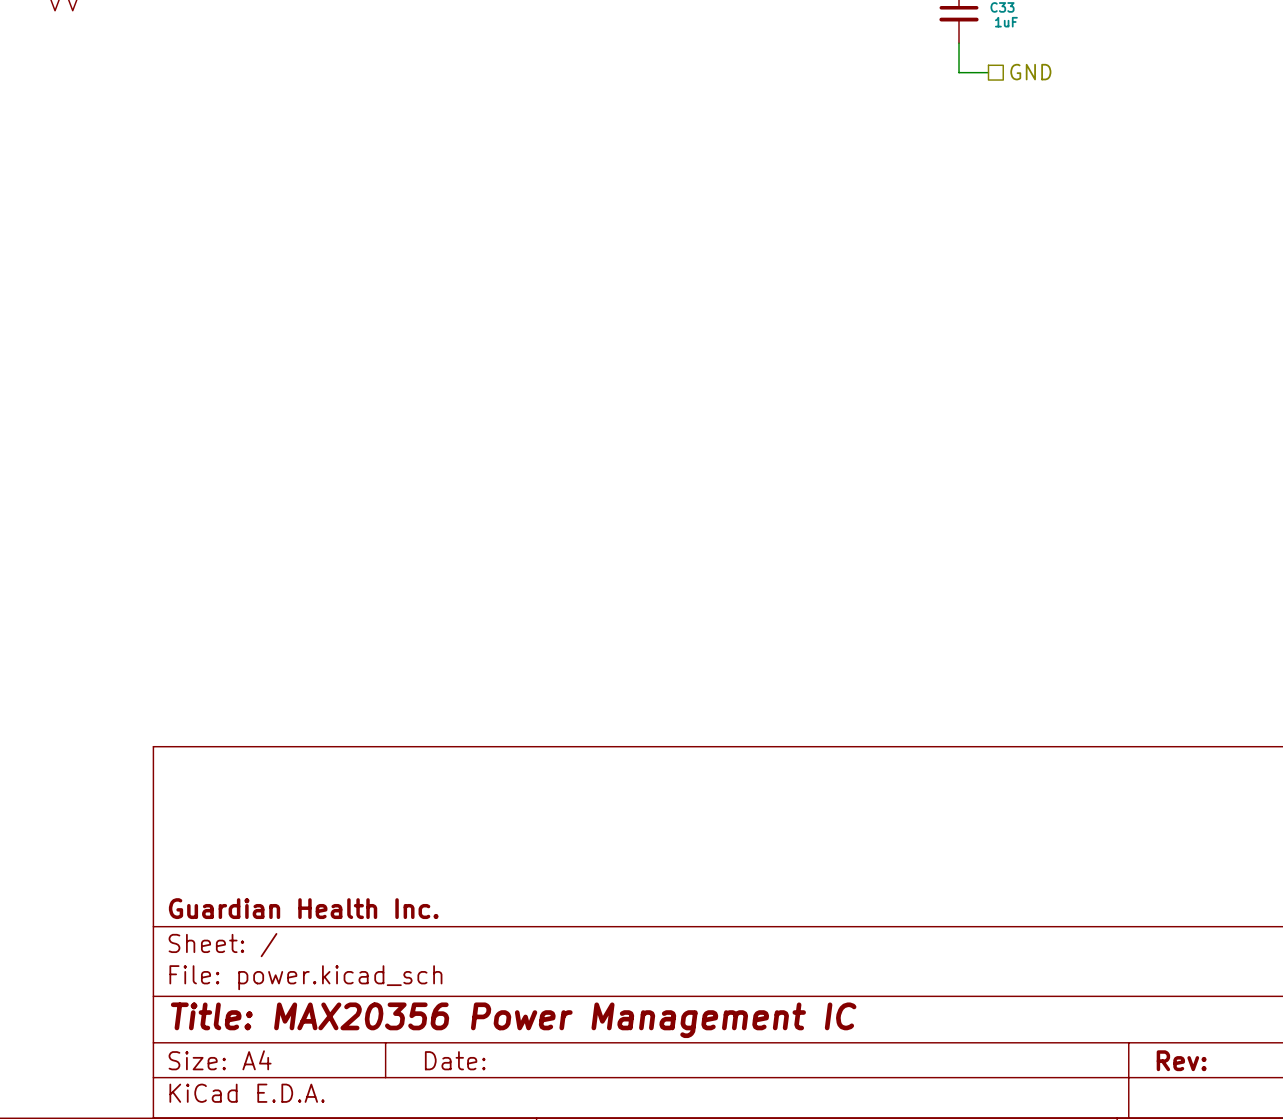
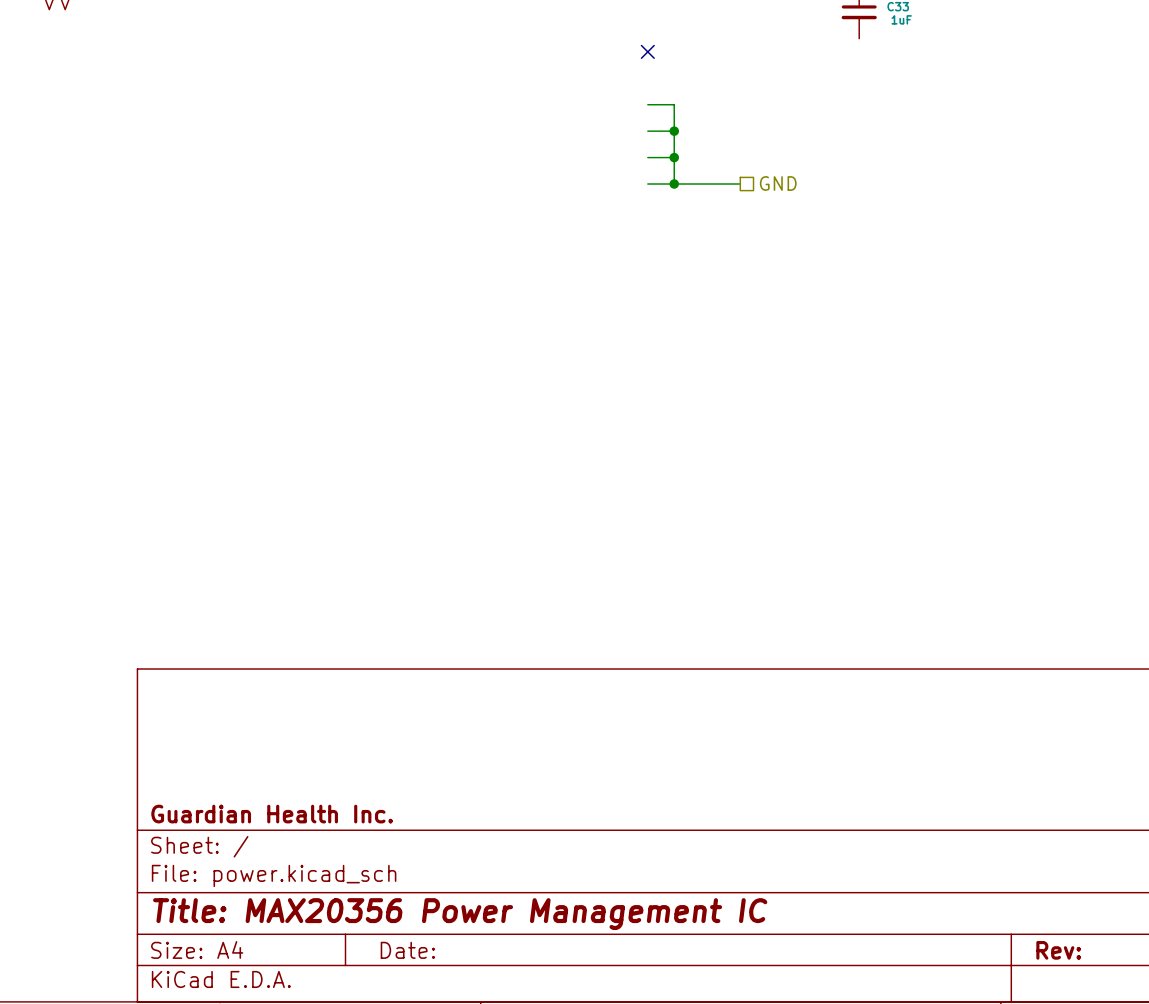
wire: (959, 43) (959, 72) (988, 72) -> none
no-connect mark: none -> (647, 51)
hierarchical label: GND (1030, 72) -> none
wire: none -> (647, 104) (674, 104) (674, 184)
wire: none -> (647, 131) (674, 131)
junction: none -> (674, 131)
wire: none -> (647, 157) (674, 157)
junction: none -> (674, 157)
hierarchical label: none -> GND (778, 183)
wire: none -> (647, 184) (740, 184)
junction: none -> (674, 184)

